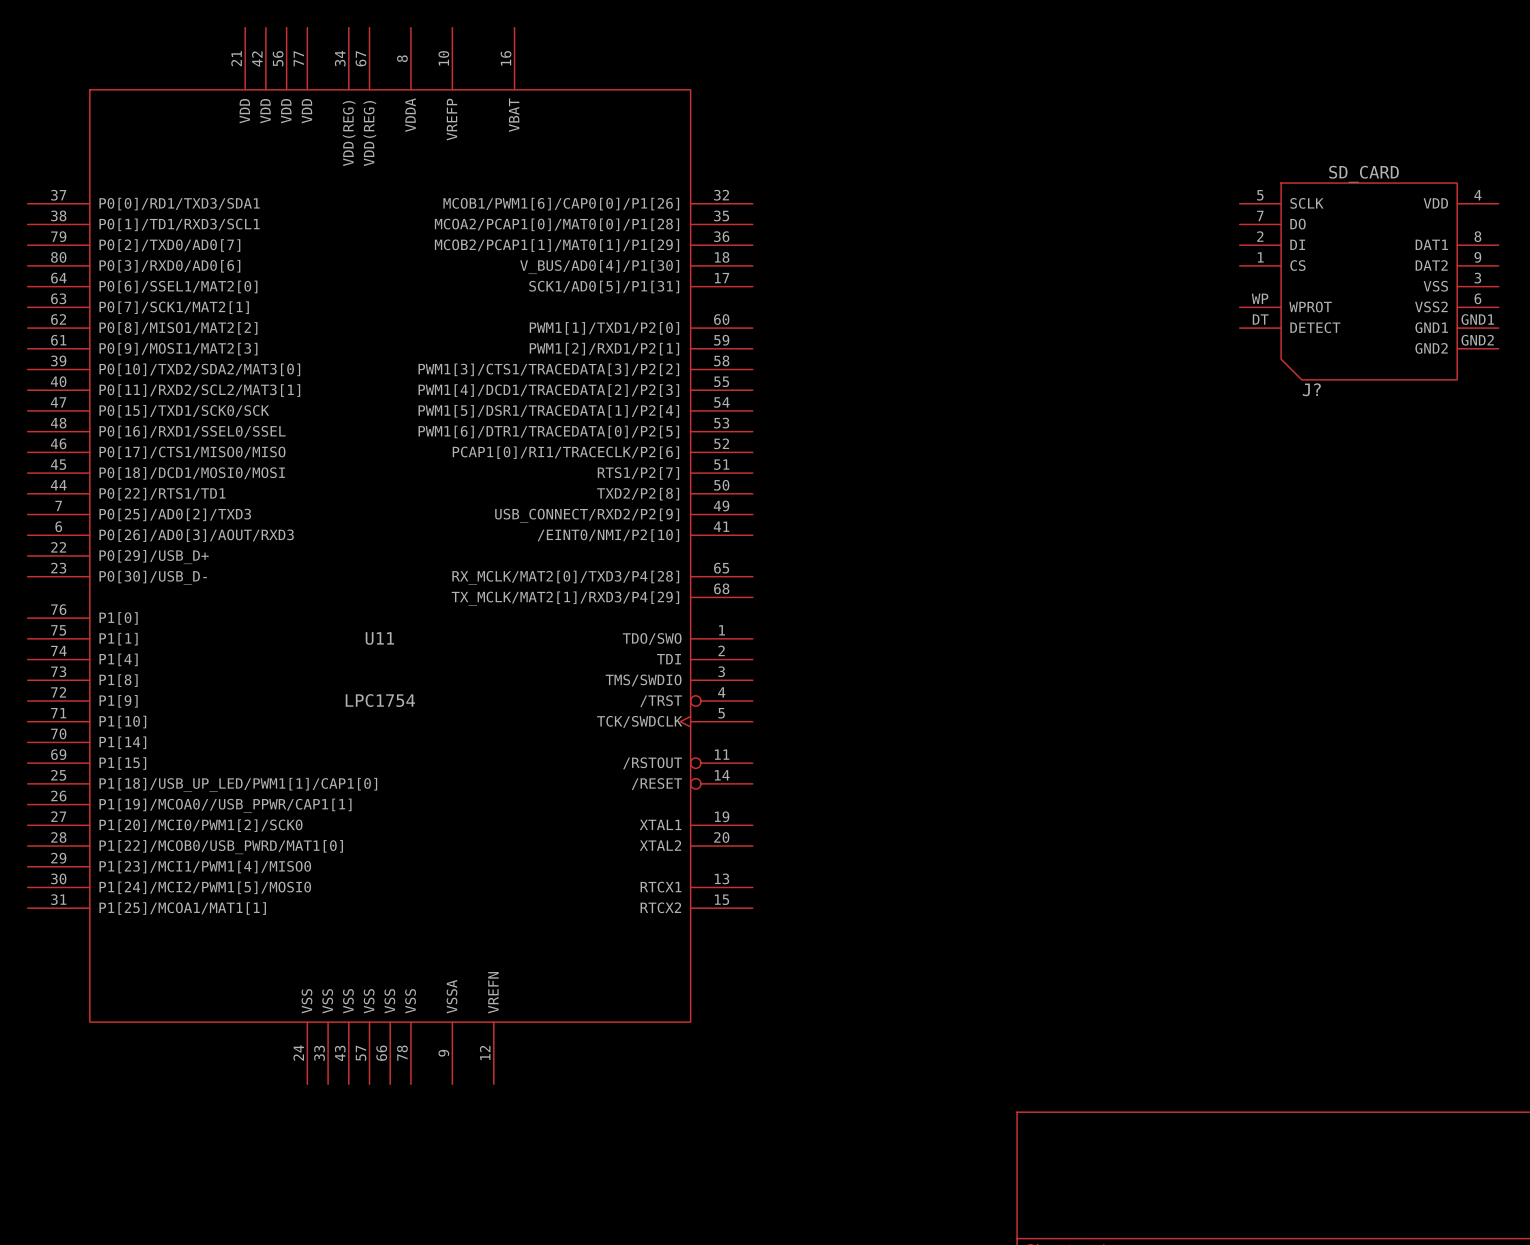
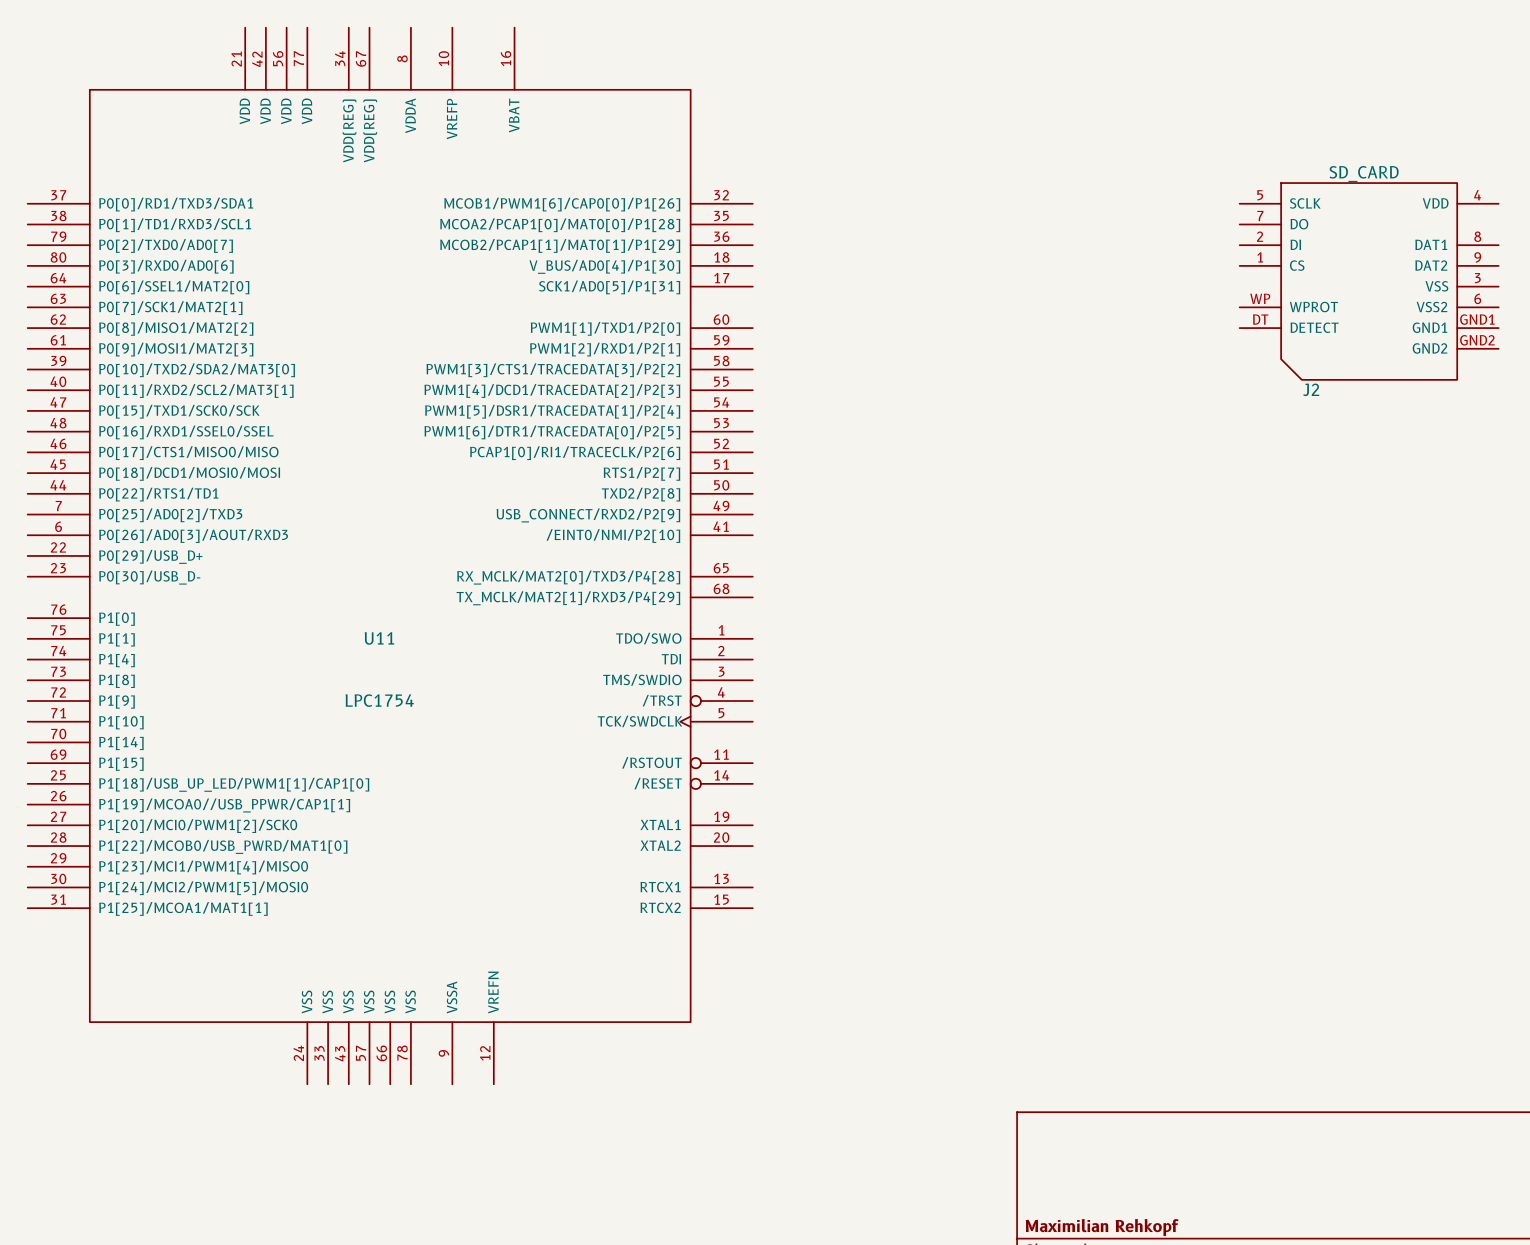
J? name: J? (1311, 389) -> J2 (1311, 389)
title block: none -> Maximilian Rehkopf (1102, 1227)

